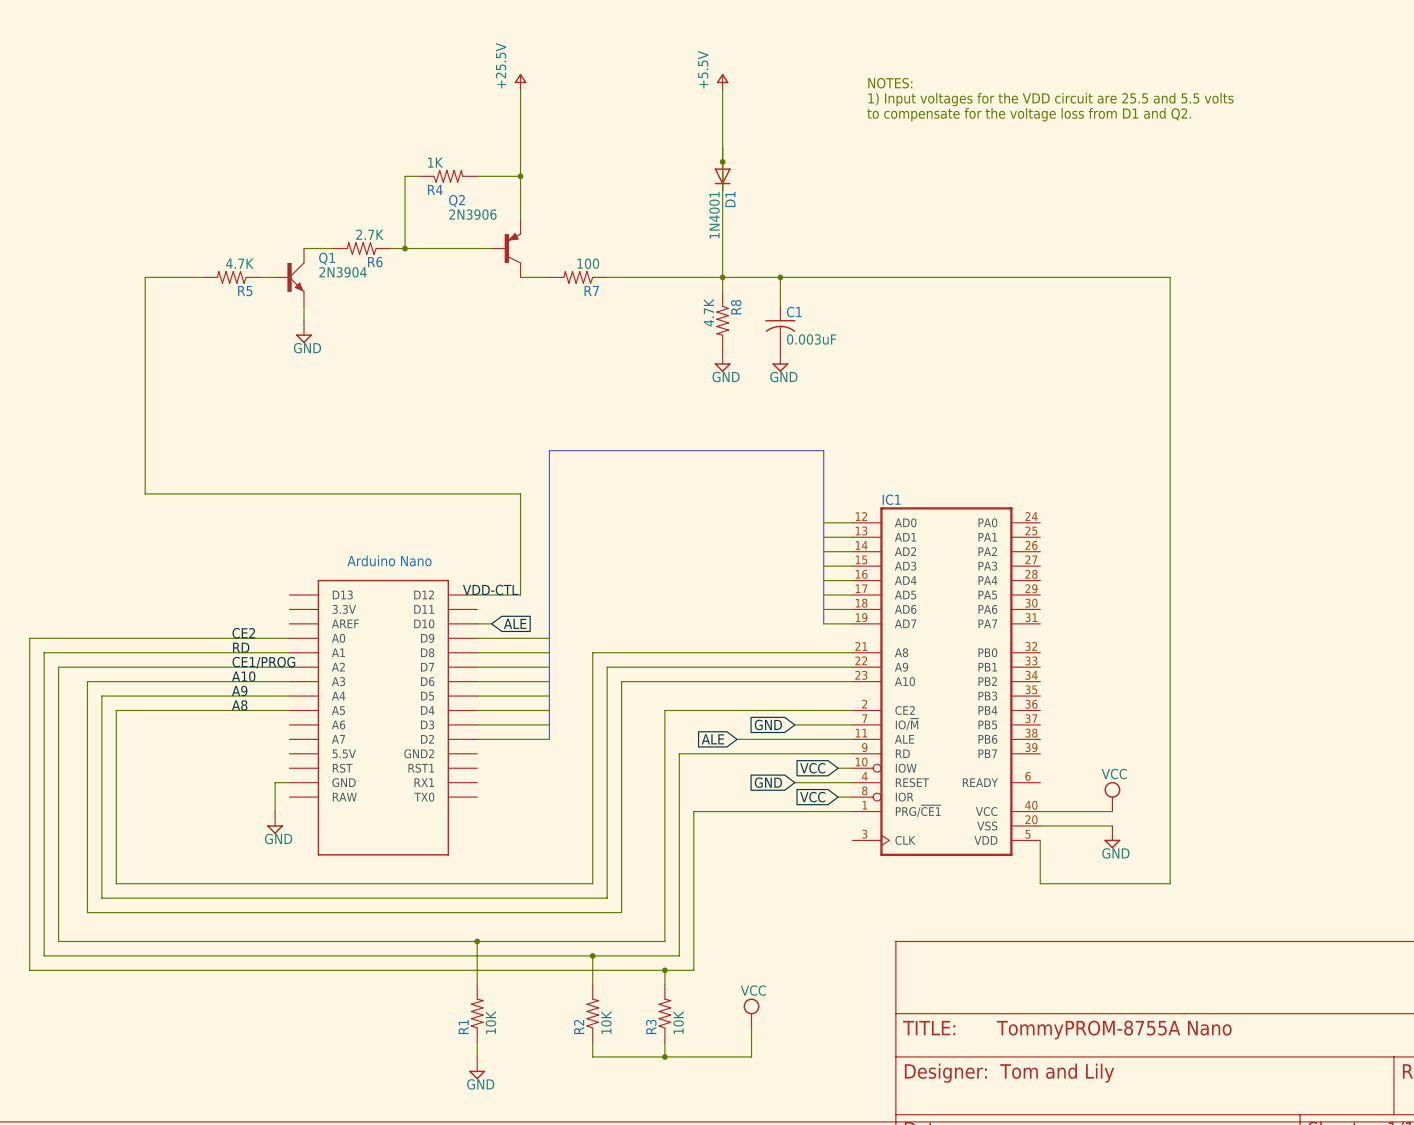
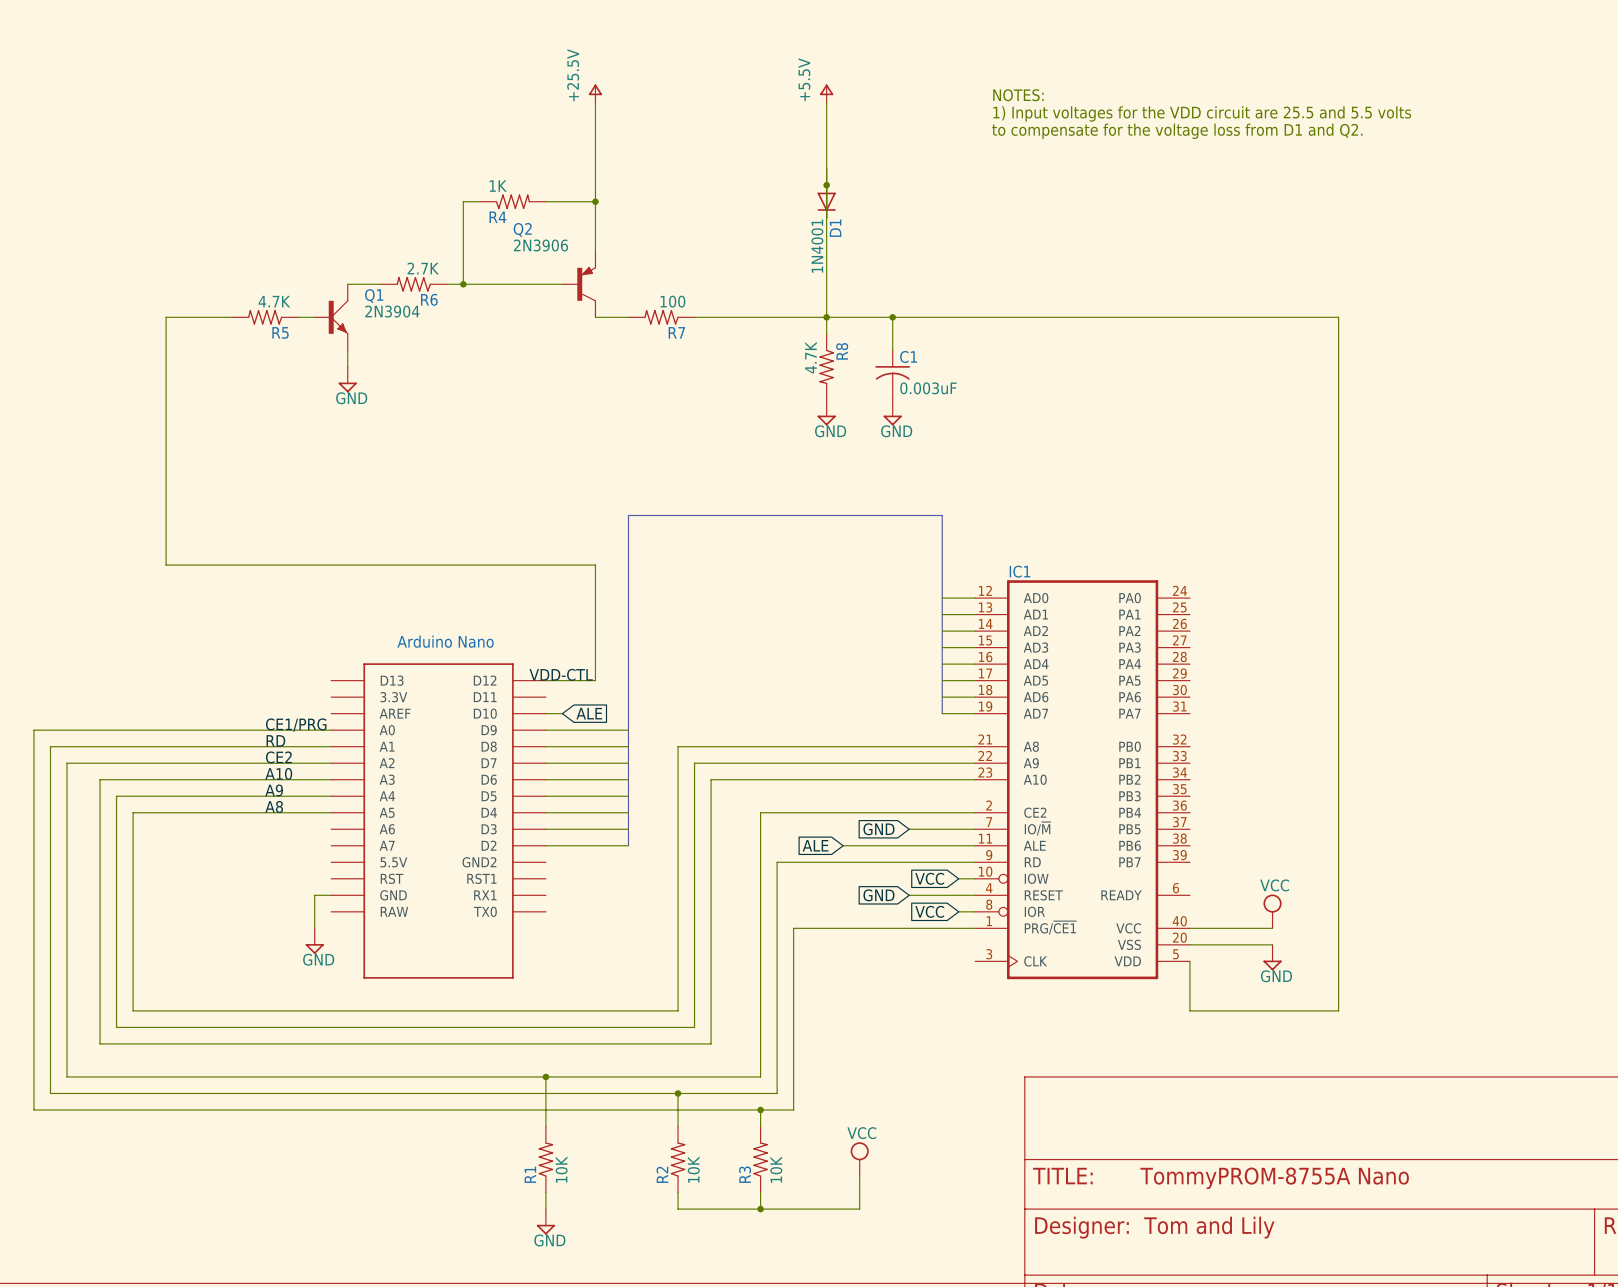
label: CE2 (243, 633) -> CE1/PRG (296, 725)
label: CE1/PROG (263, 662) -> CE2 (278, 757)

